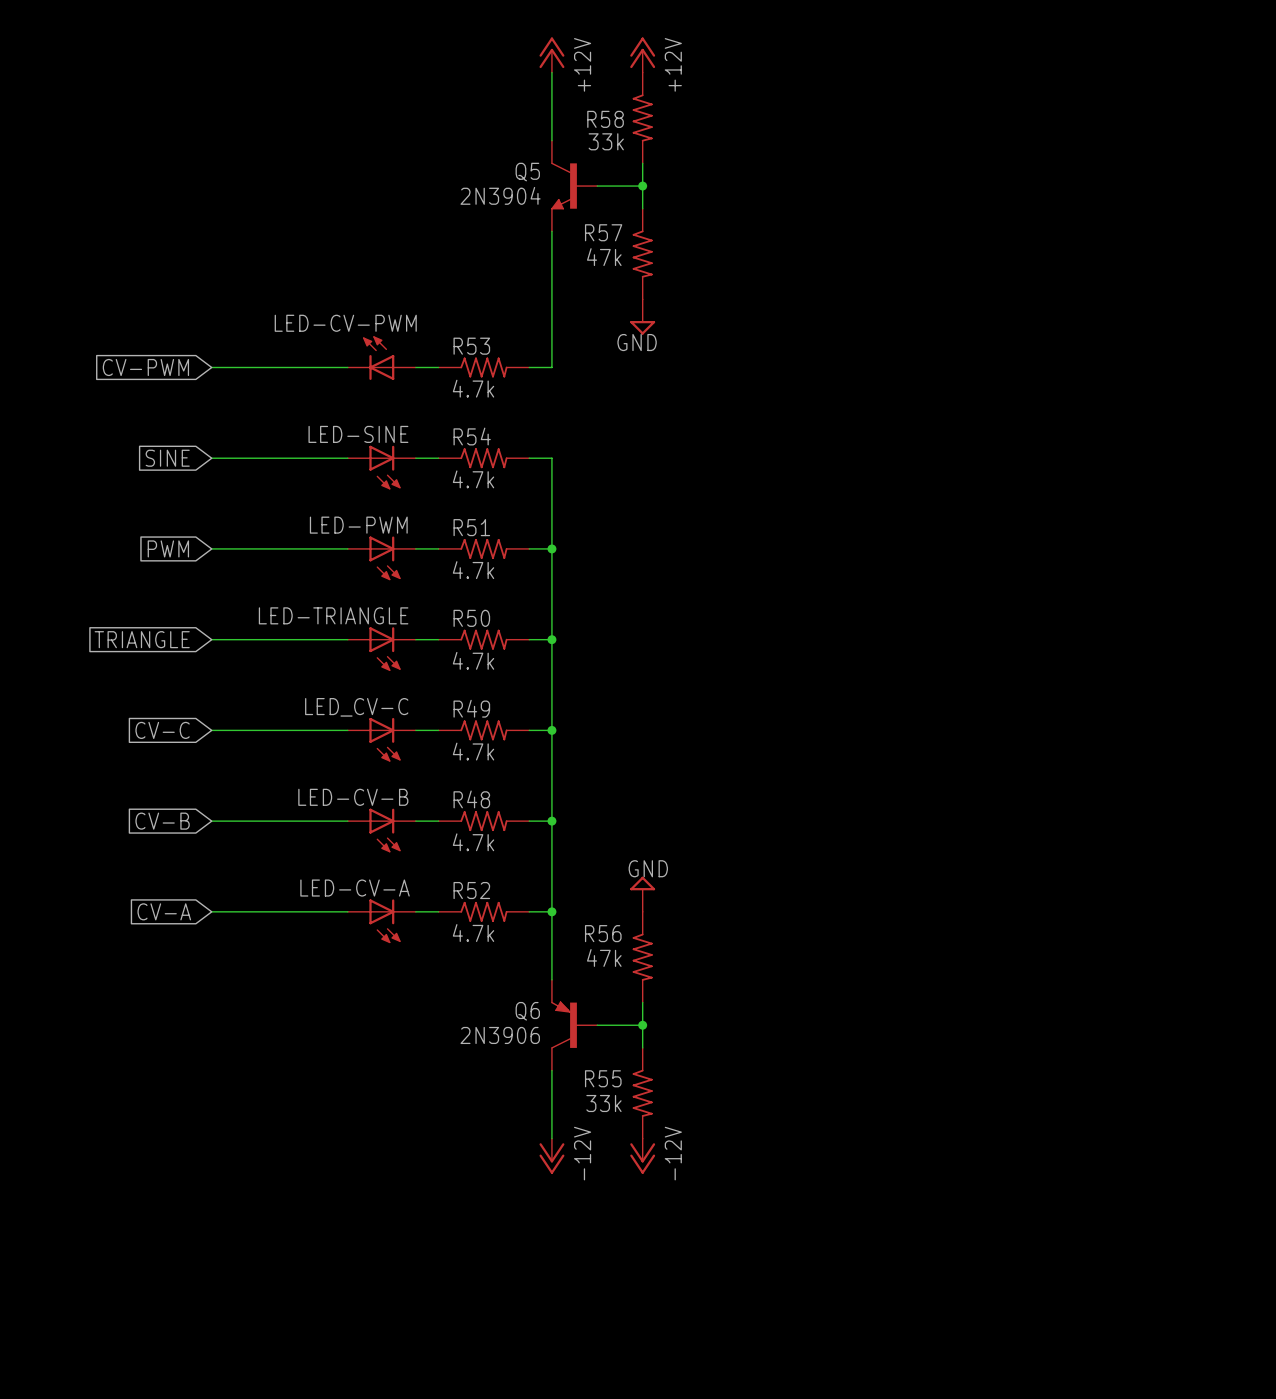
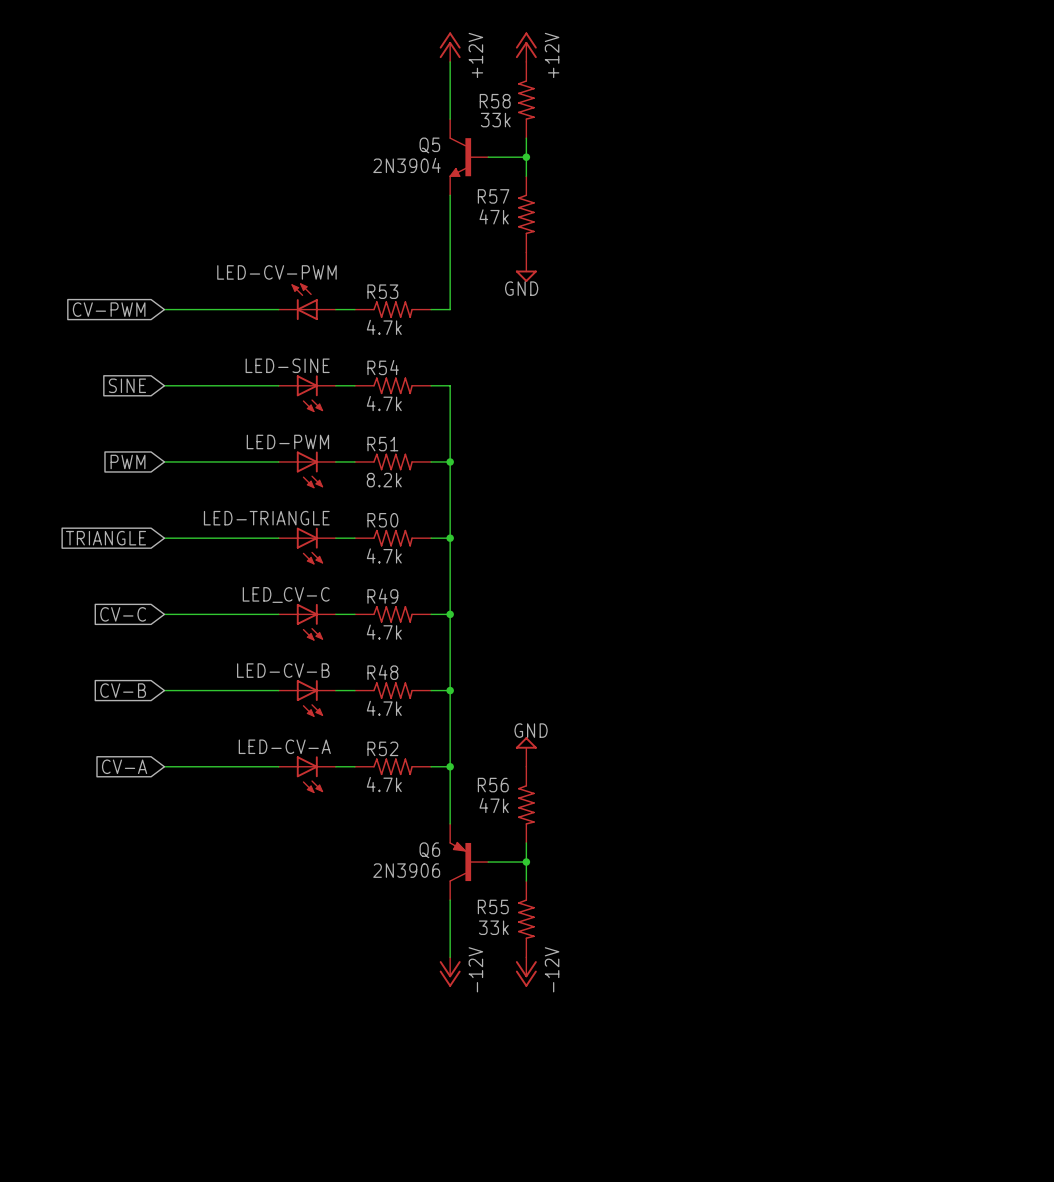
R51 value: 4.7k (473, 570) -> 8.2k (384, 480)

